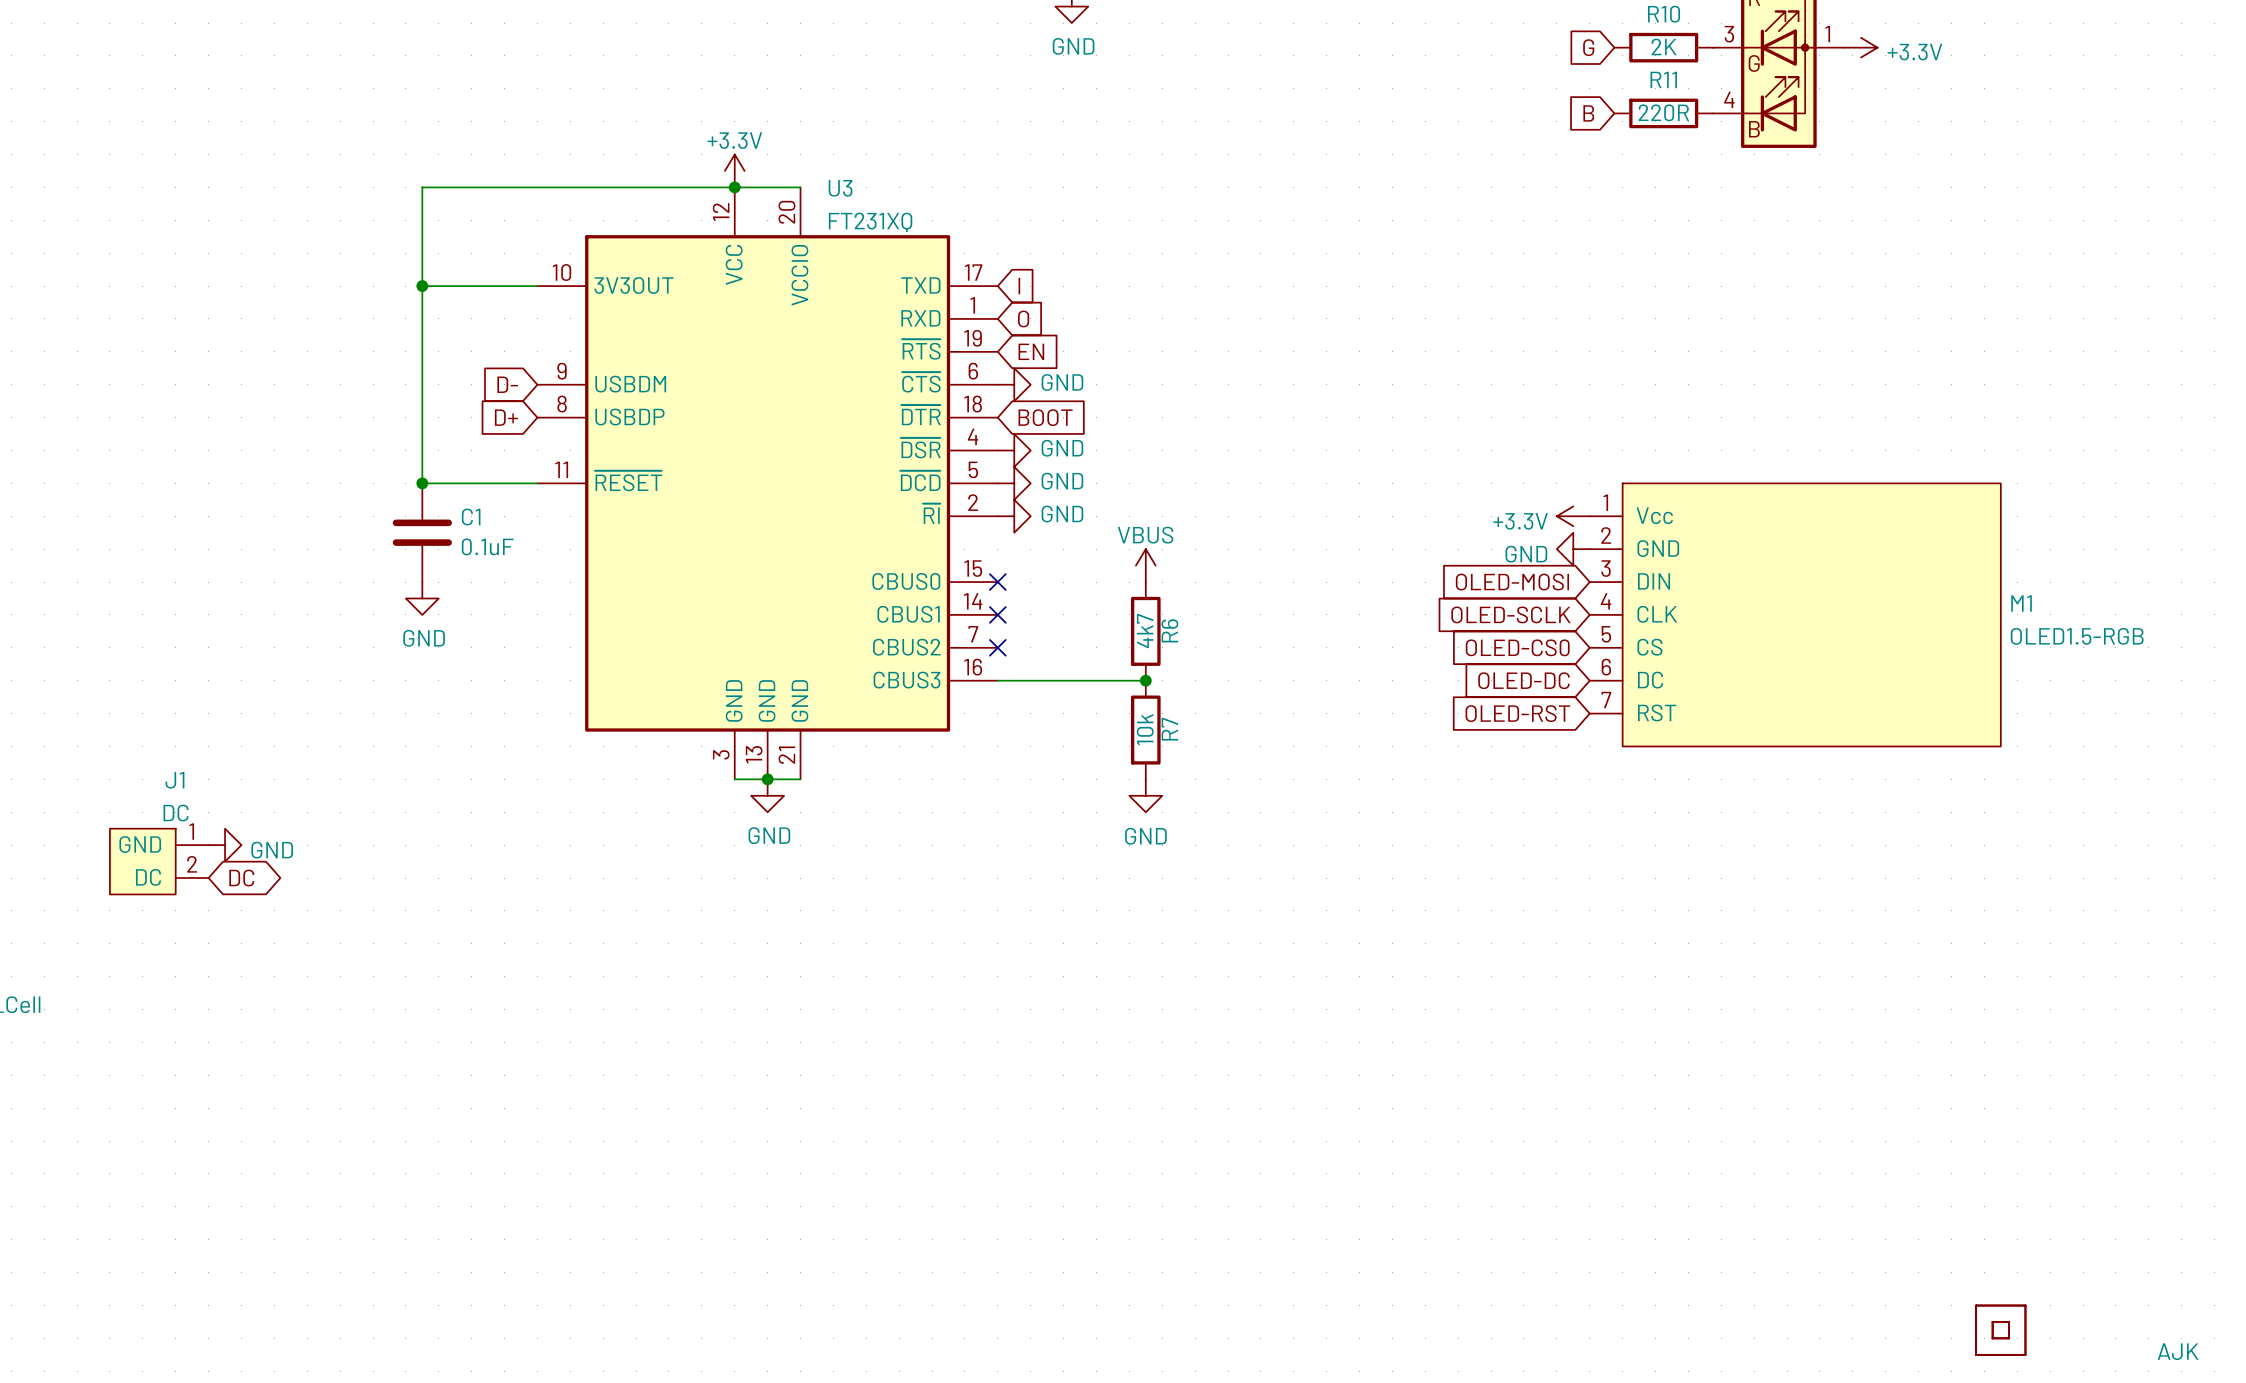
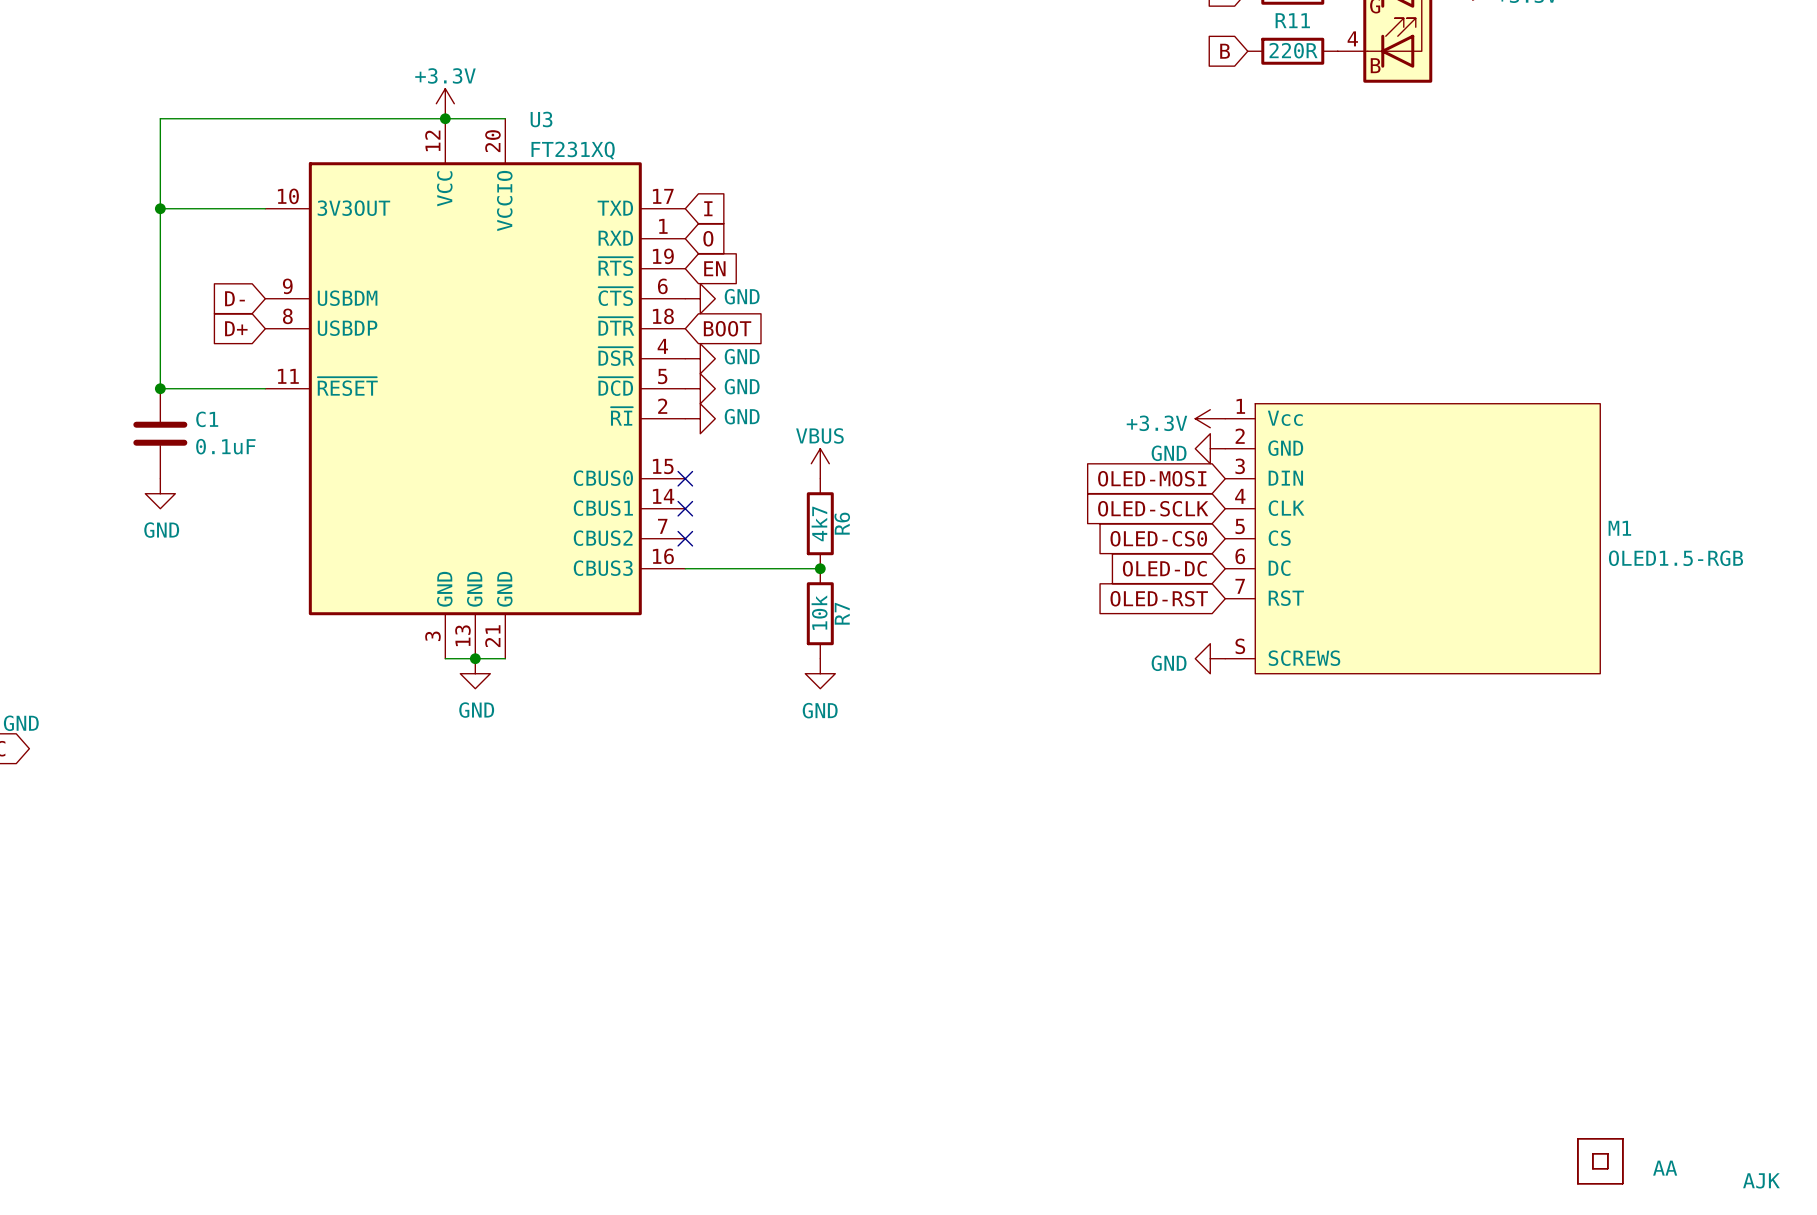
M1 symbol: [1589, 483, 2001, 747] -> [1225, 403, 1601, 674]
power symbol: none -> GND (1210, 658)
part: none -> AA (1665, 1168)

